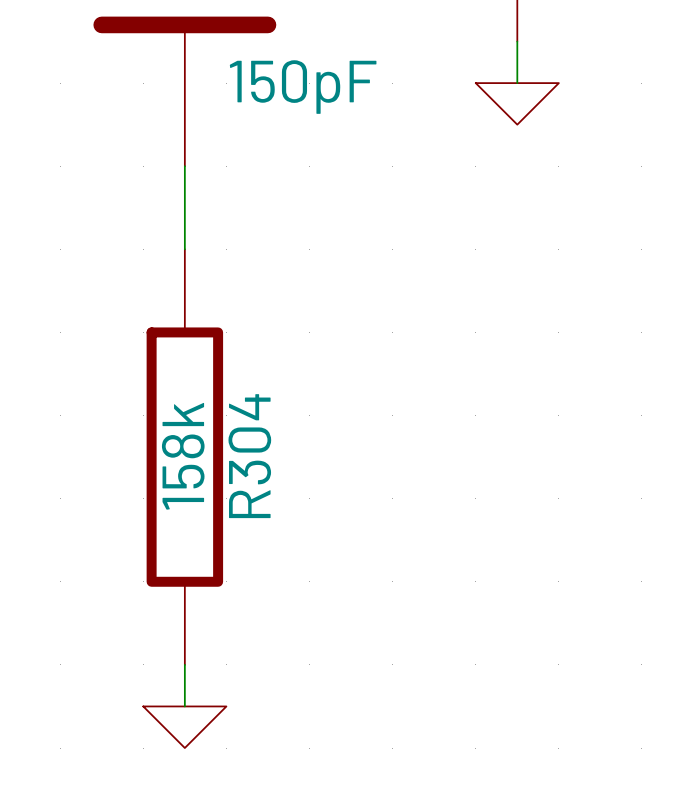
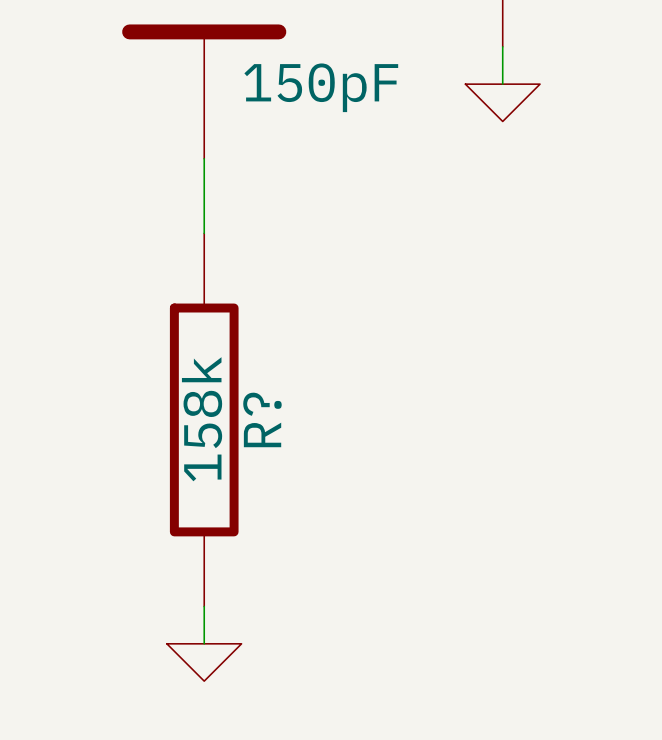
R304 name: R304 (249, 456) -> R? (262, 419)

